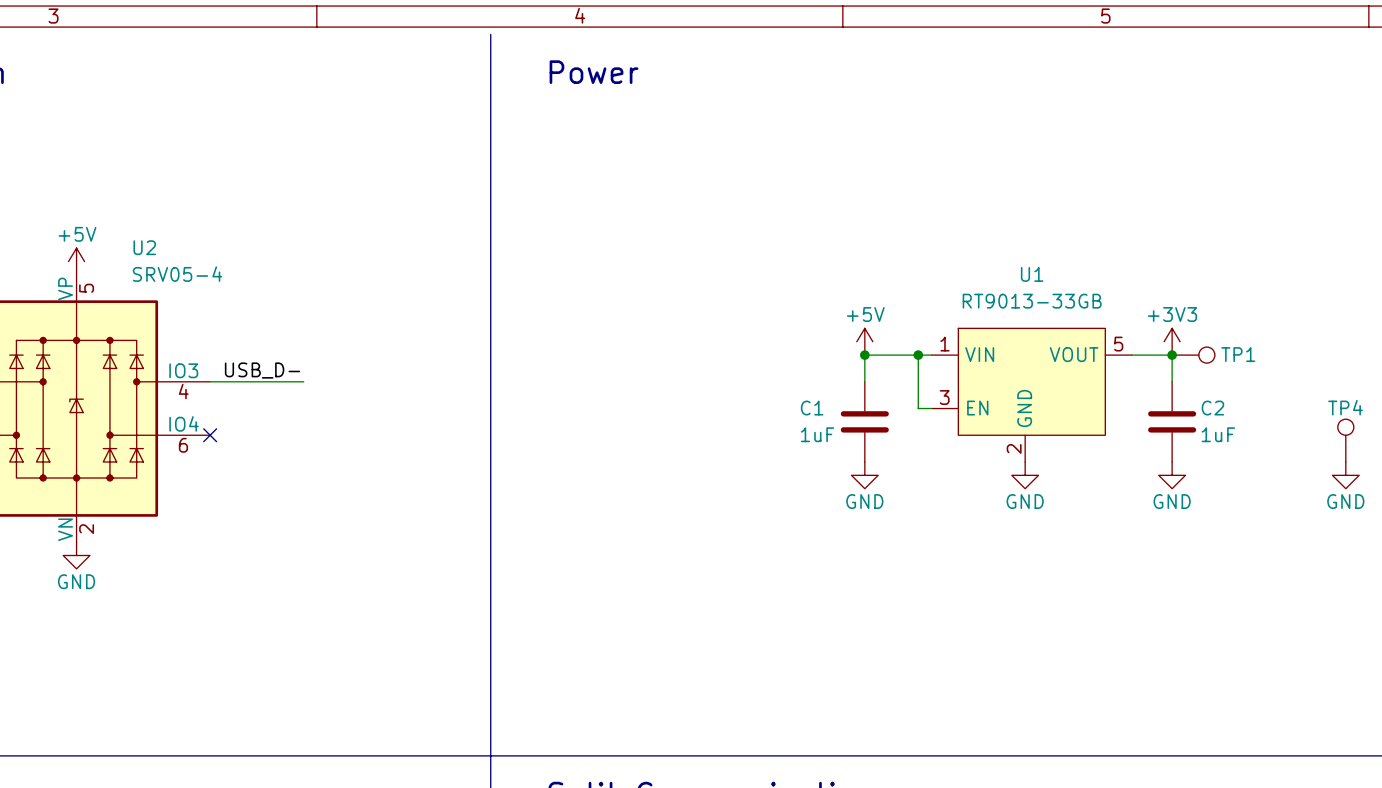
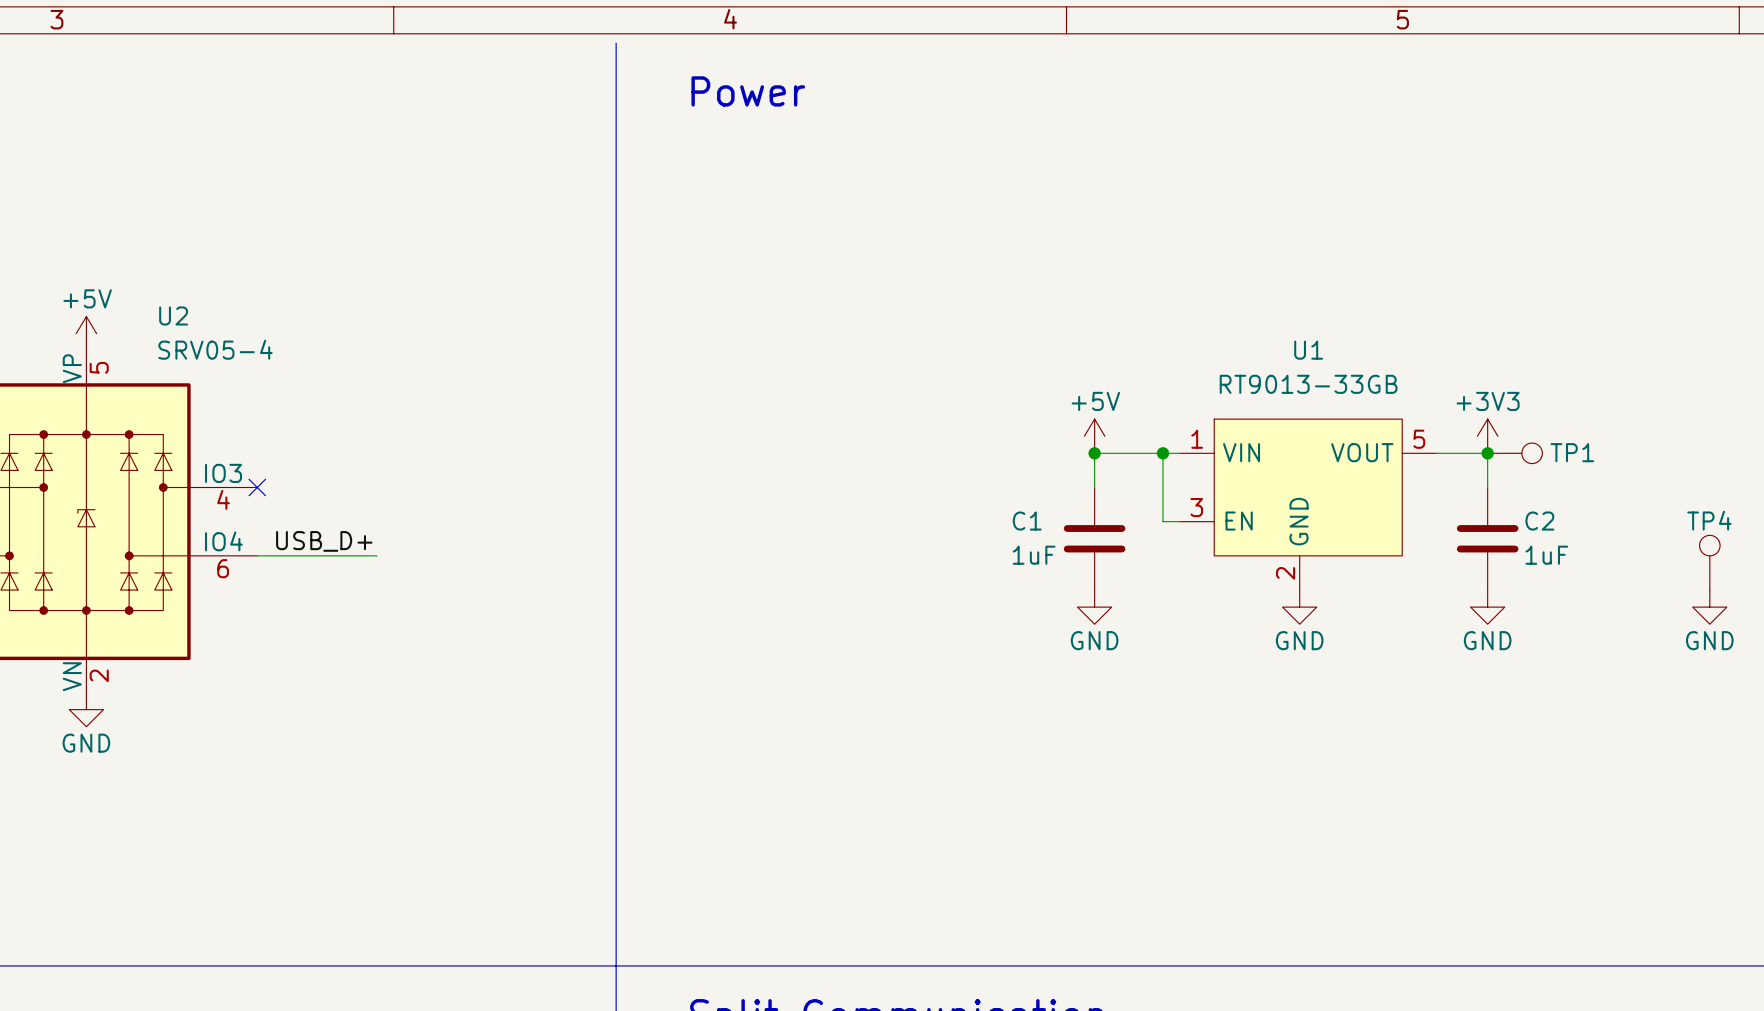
label: USB_D- (262, 370) -> none
wire: (210, 381) (303, 381) -> (257, 555) (376, 555)
label: none -> USB_D+ (324, 541)
no-connect mark position: (210, 435) -> (257, 487)

